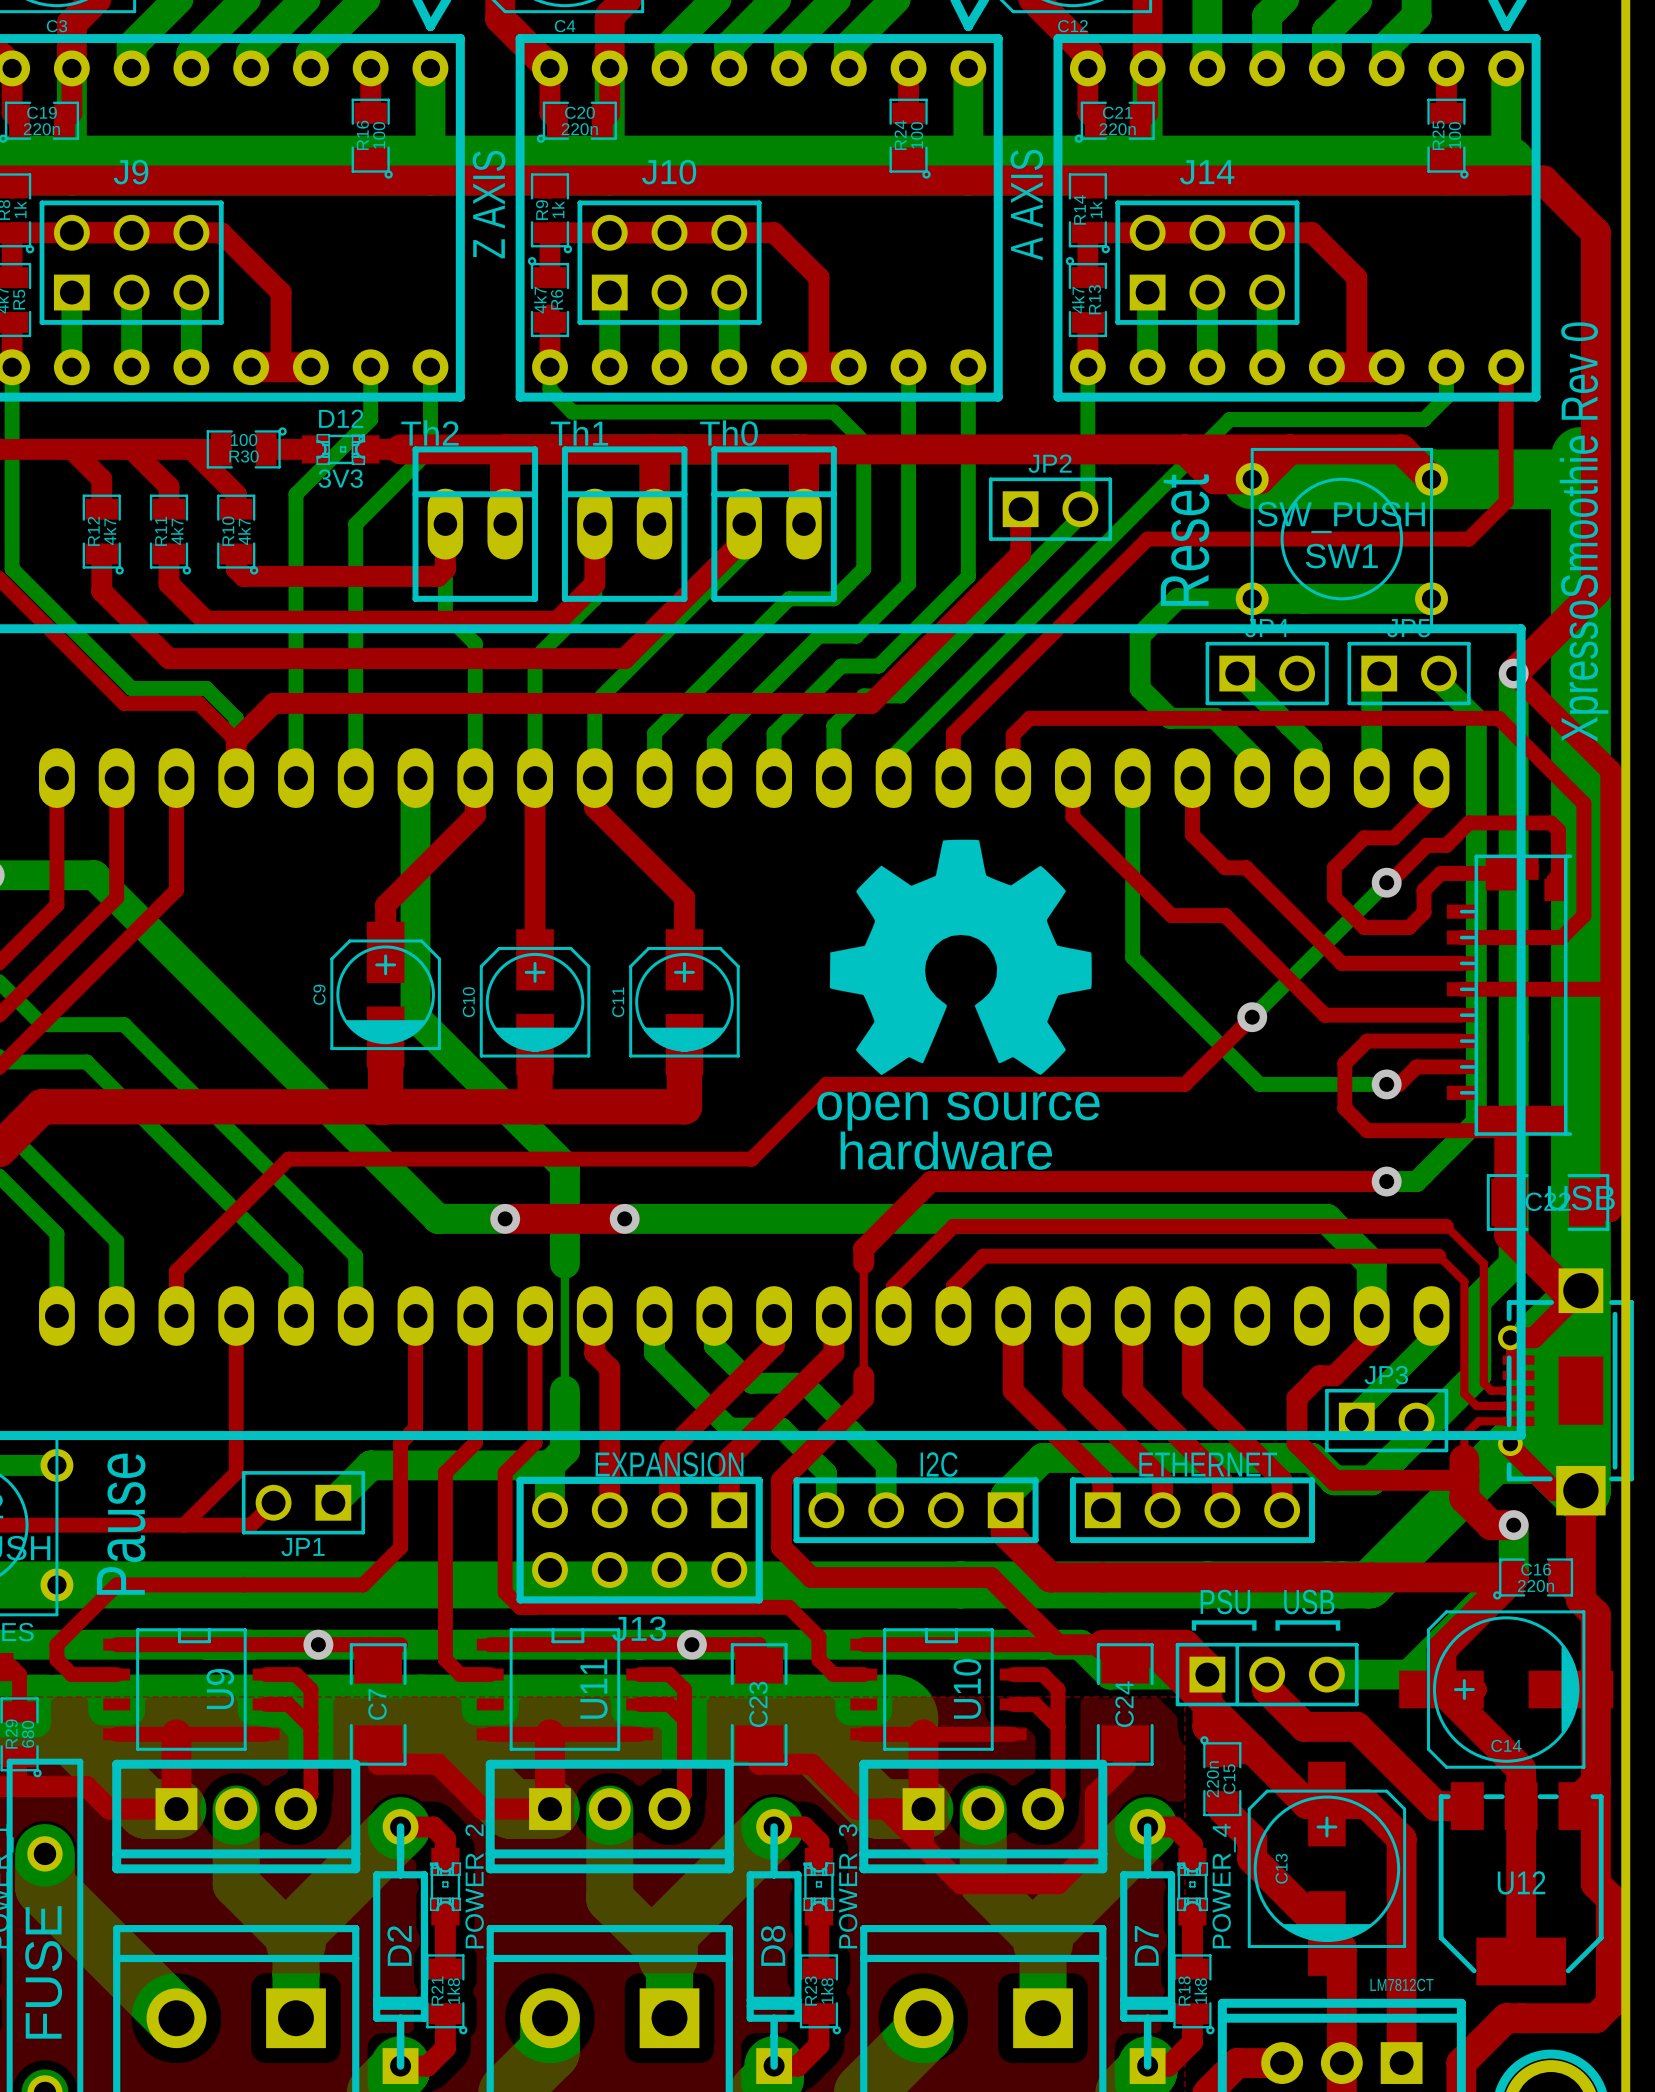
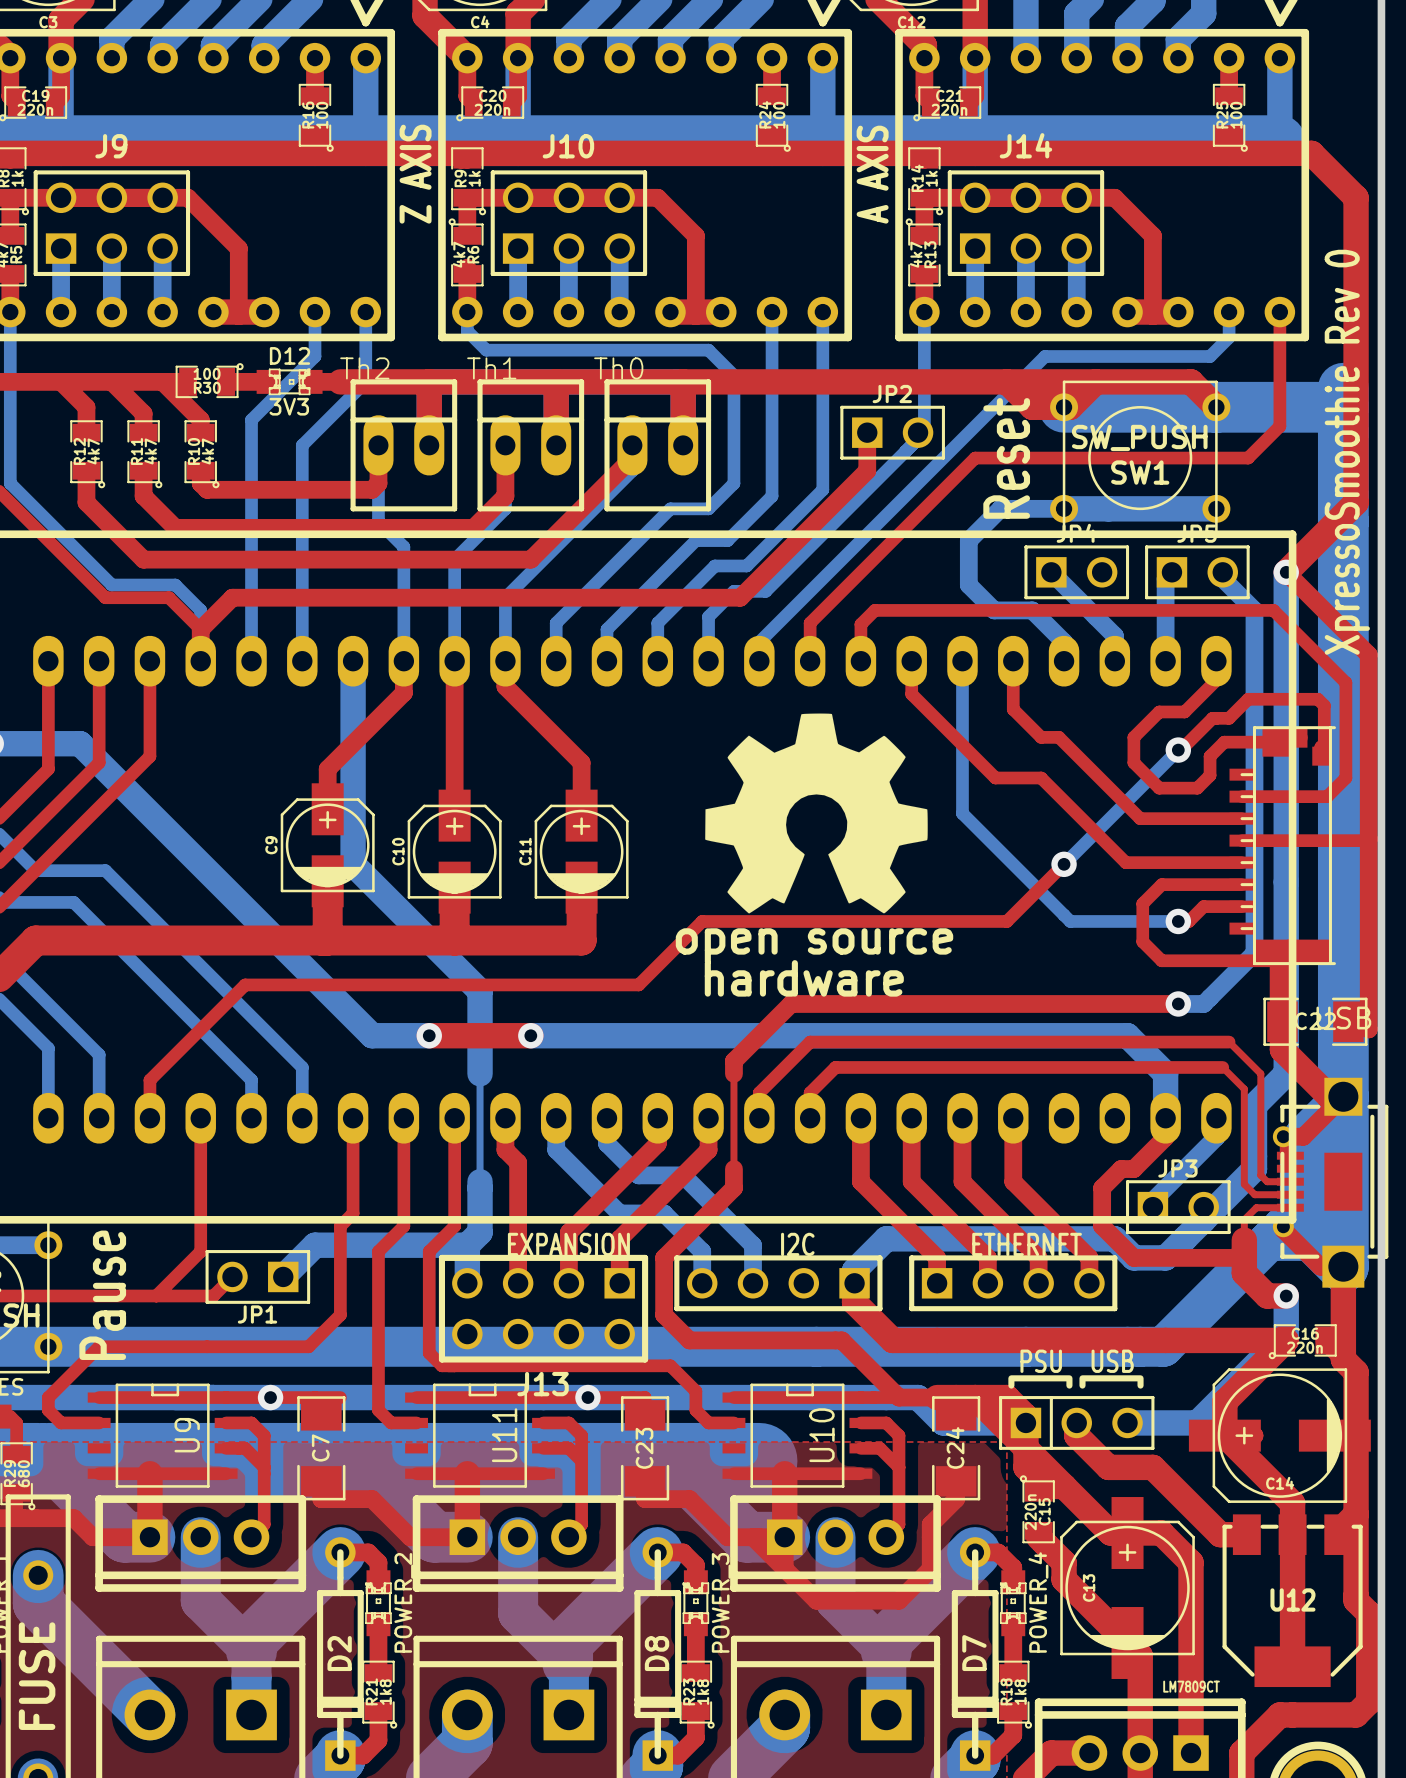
part value: LM7812CT (1402, 1984) -> LM7809CT (1191, 1686)

